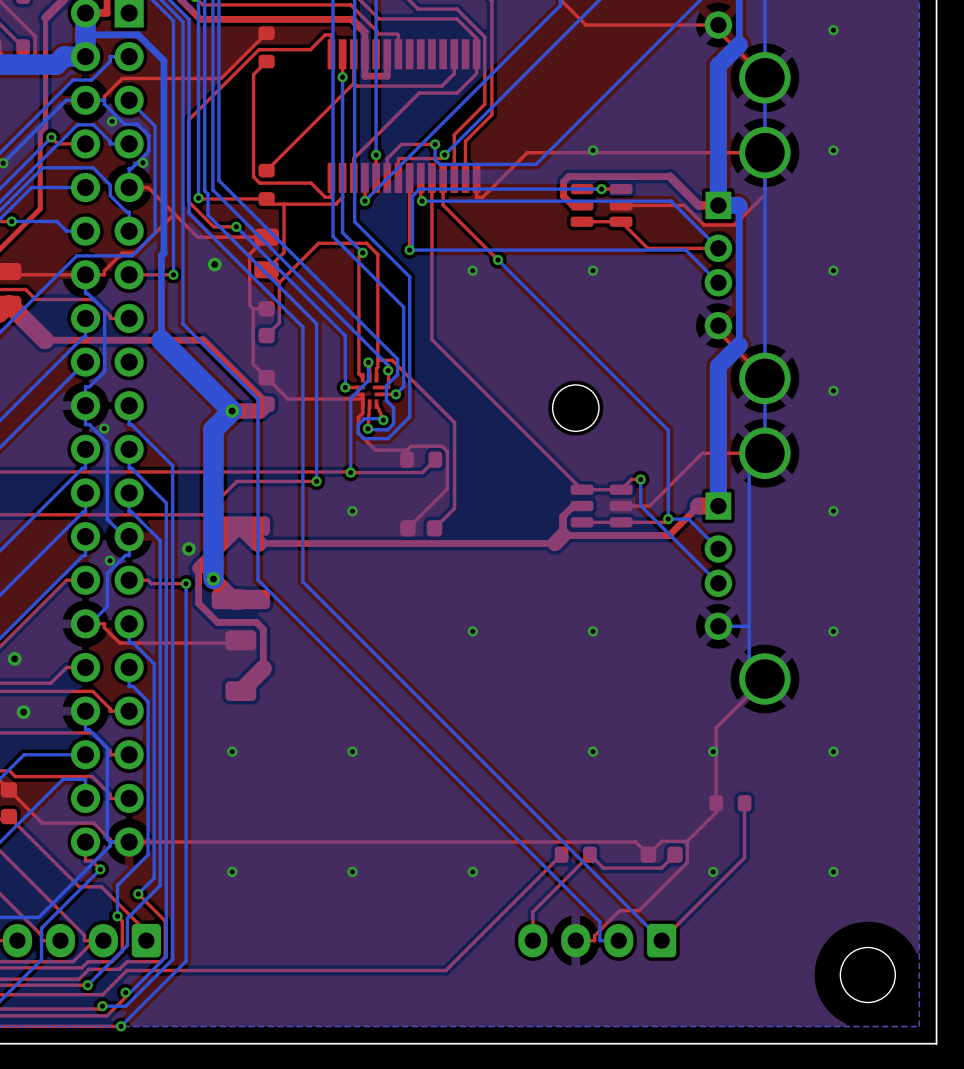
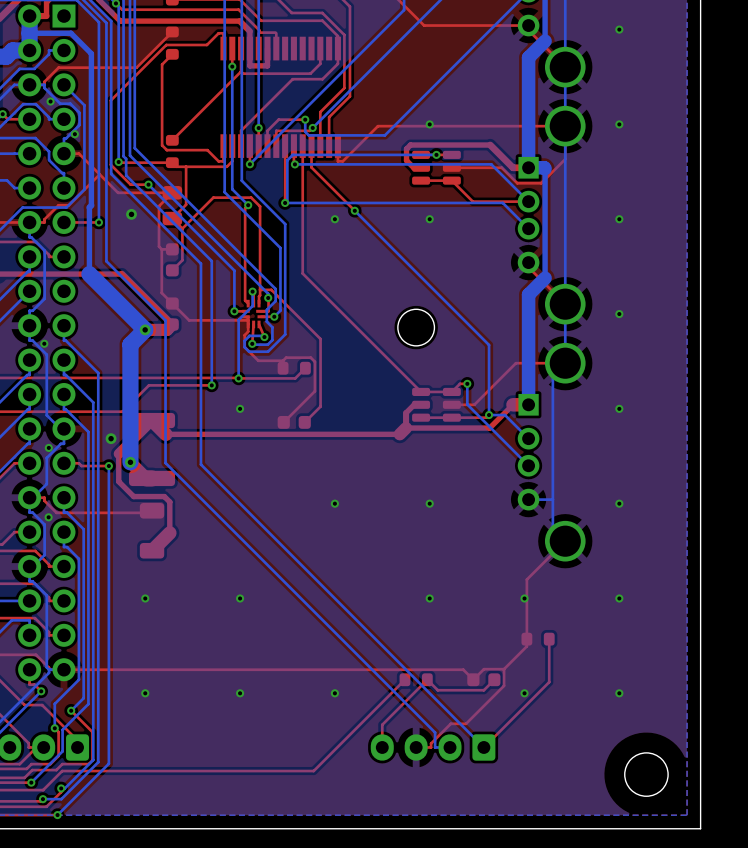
bottom track: none -> (29, 505) (29, 512) (32, 512) (44, 524) (44, 555) (29, 570)
via: none -> (48, 517)

